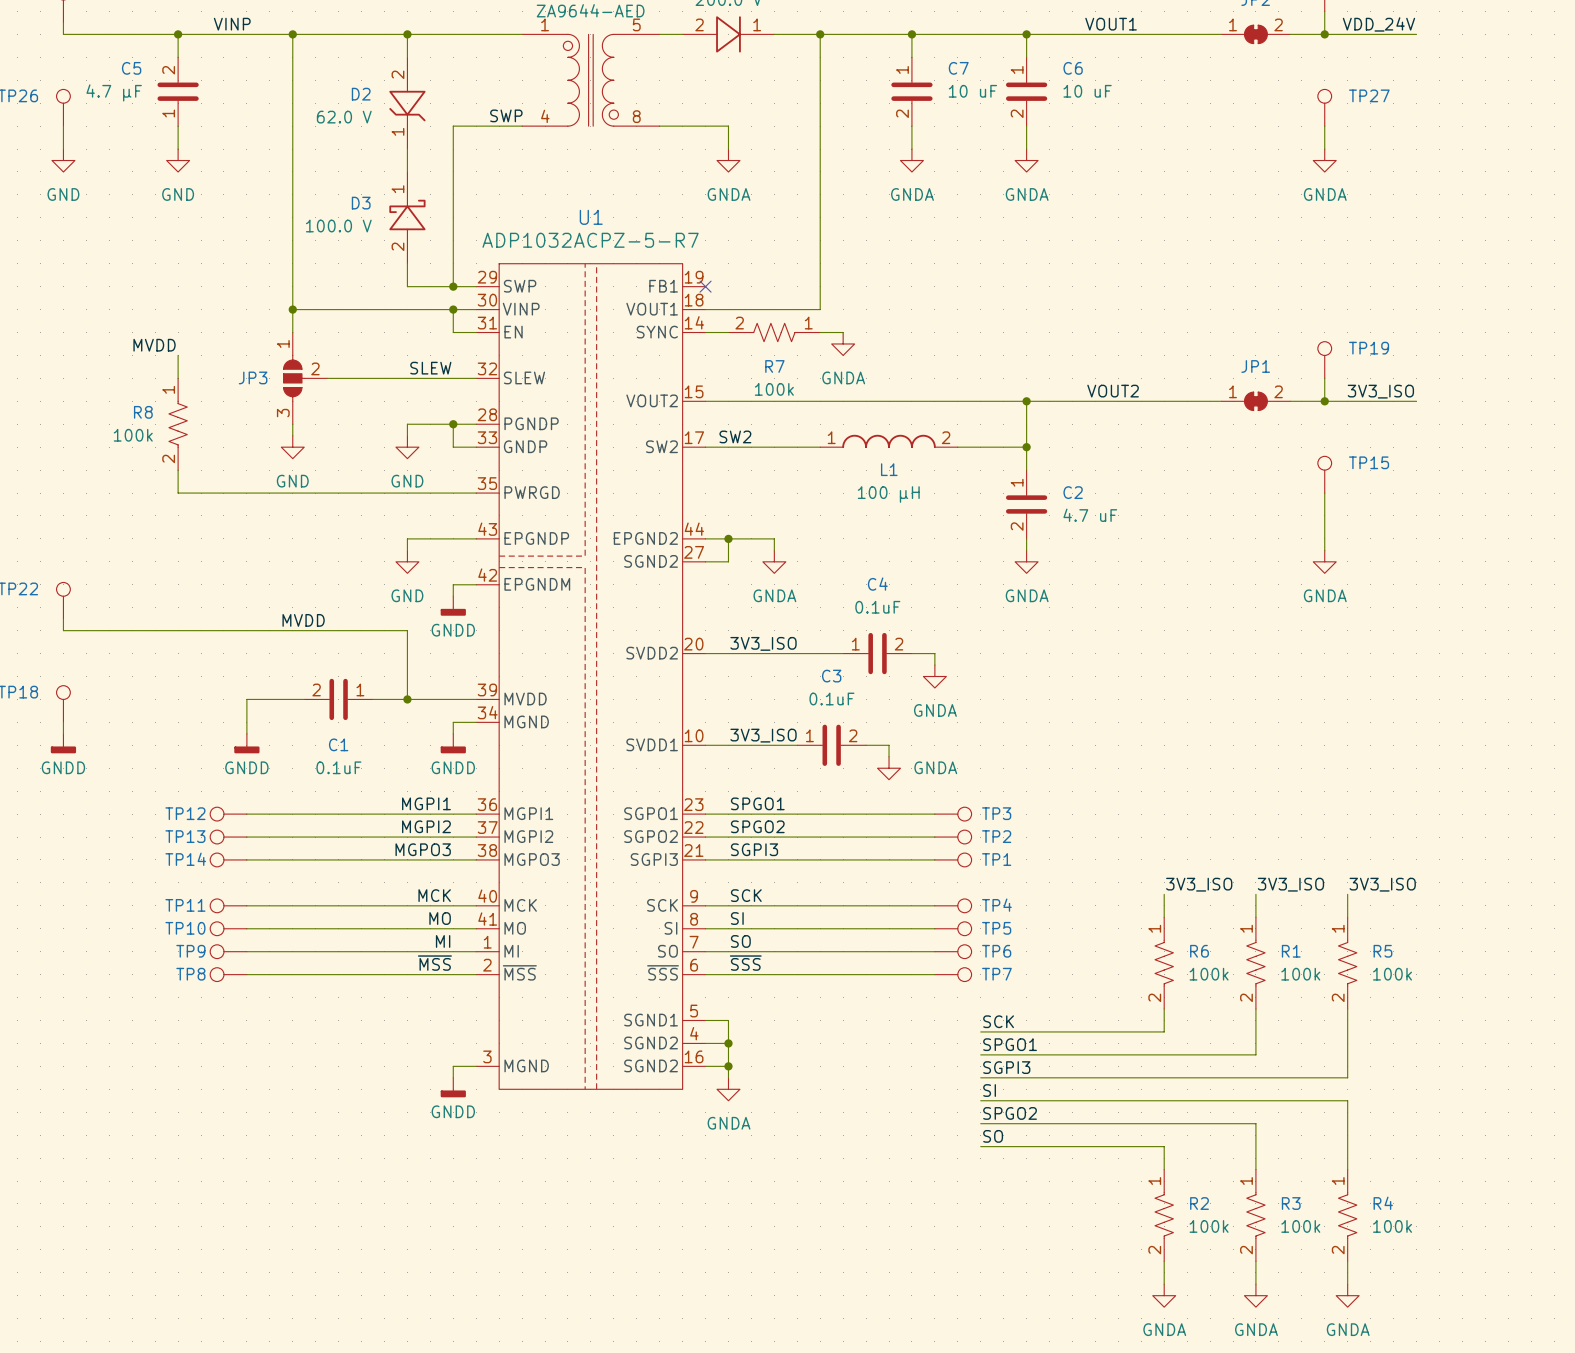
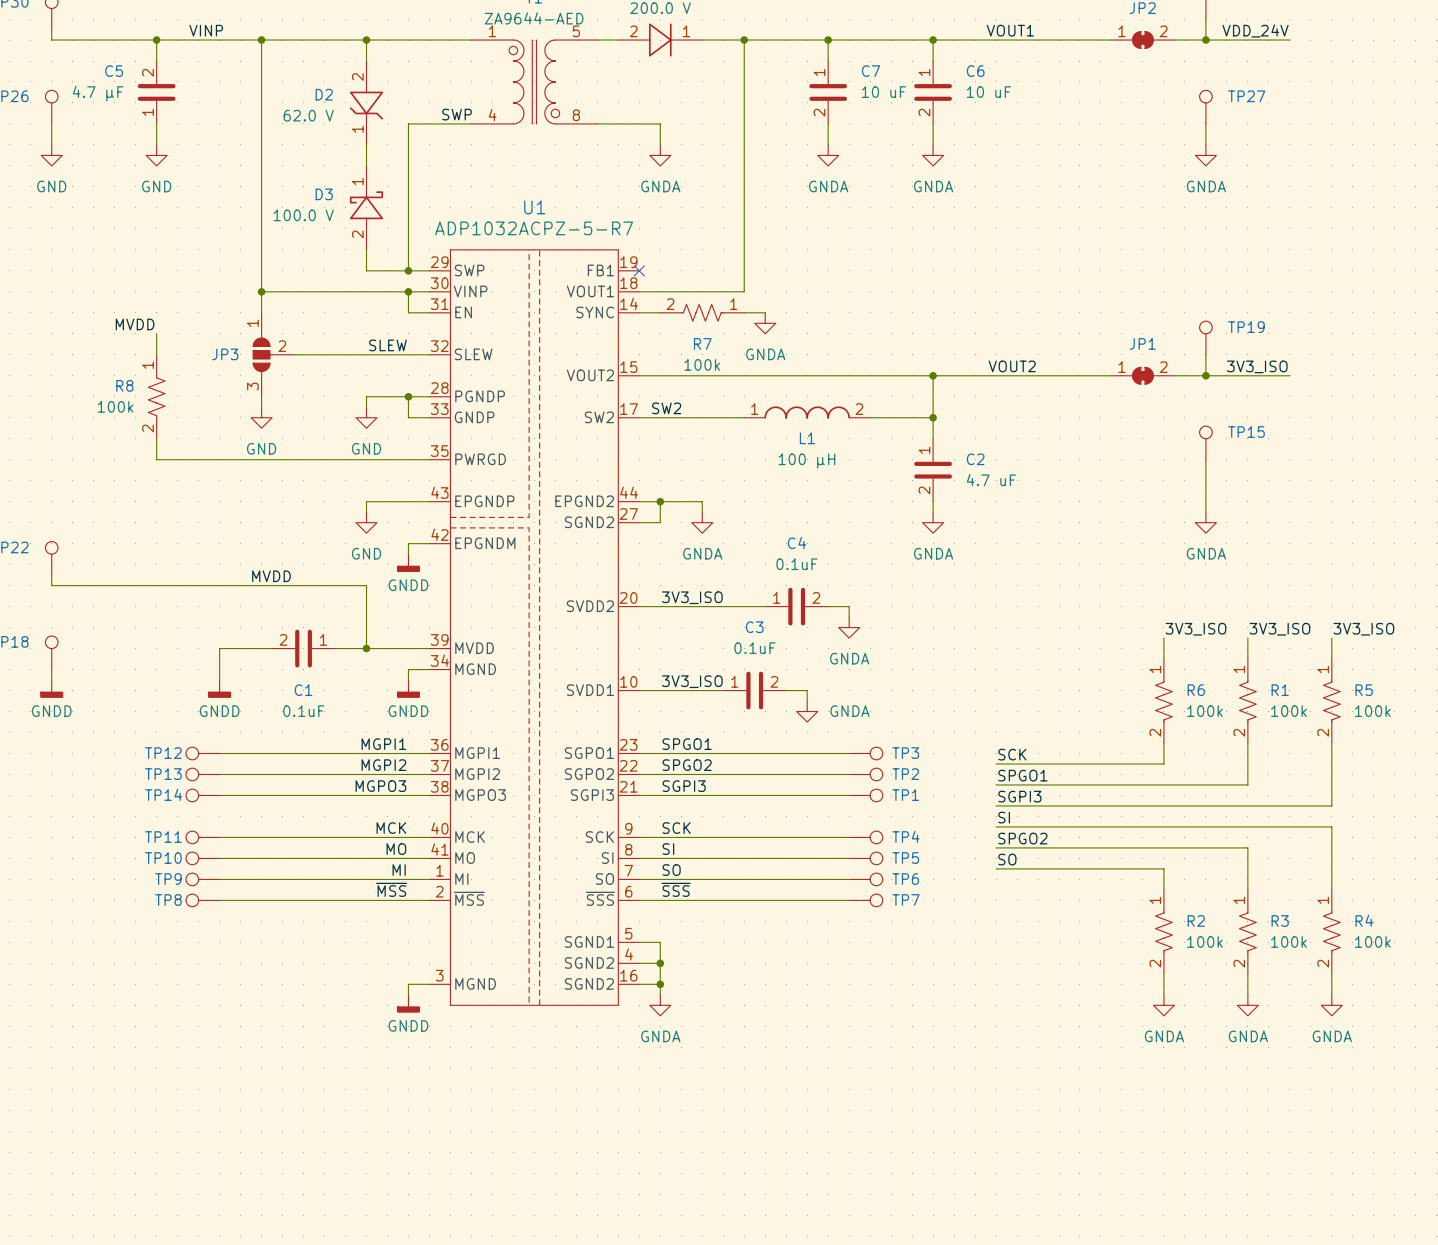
label: none -> 3V3_ISO (1195, 629)
label: none -> 3V3_ISO (1279, 629)
label: none -> 3V3_ISO (1363, 629)
wire: none -> (1331, 638) (1331, 659)
wire: none -> (1163, 743) (1163, 763) (996, 763)
wire: none -> (1247, 743) (1247, 784) (996, 784)
wire: none -> (1331, 743) (1331, 805) (996, 805)
label: none -> SCK (1012, 754)
label: none -> SPGO1 (1022, 775)
label: none -> SGPI3 (1019, 796)
label: none -> SI (1004, 817)
label: 3V3_ISO (1199, 884) -> none
label: 3V3_ISO (1290, 884) -> none
label: 3V3_ISO (1382, 884) -> none
wire: none -> (996, 826) (1331, 826) (1331, 889)
wire: (1164, 894) (1164, 917) -> none
wire: (1255, 894) (1255, 917) -> (1163, 638) (1163, 659)
wire: (1347, 894) (1347, 917) -> (1247, 638) (1247, 659)
label: none -> SPGO2 (1022, 838)
wire: none -> (996, 847) (1247, 847) (1247, 889)
label: none -> SO (1007, 859)
wire: none -> (996, 868) (1163, 868) (1163, 889)
R6 position: (1164, 963) -> (1163, 701)
R1 position: (1255, 963) -> (1247, 701)
R5 position: (1347, 963) -> (1331, 701)
wire: (1164, 1009) (1164, 1031) (980, 1031) -> none
wire: (1255, 1009) (1255, 1054) (980, 1054) -> none
wire: (1347, 1009) (1347, 1077) (980, 1077) -> none
label: SCK (998, 1021) -> none
label: SPGO1 (1010, 1044) -> none
wire: none -> (1331, 973) (1331, 994)
label: SGPI3 (1006, 1067) -> none
power symbol: none -> GNDA (1163, 1005)
power symbol: none -> GNDA (1247, 1005)
power symbol: none -> GNDA (1331, 1005)
label: SI (989, 1090) -> none
wire: (980, 1100) (1347, 1100) (1347, 1169) -> none
label: SPGO2 (1010, 1113) -> none
wire: (980, 1123) (1255, 1123) (1255, 1169) -> none
label: SO (993, 1136) -> none
wire: (980, 1146) (1164, 1146) (1164, 1169) -> none
R2 position: (1164, 1215) -> (1163, 931)
R3 position: (1255, 1215) -> (1247, 931)
R4 position: (1347, 1215) -> (1331, 931)
wire: (1164, 1261) (1164, 1284) -> none
wire: (1255, 1261) (1255, 1284) -> (1163, 973) (1163, 994)
wire: (1347, 1261) (1347, 1284) -> (1247, 973) (1247, 994)
power symbol: GNDA (1164, 1295) -> none
power symbol: GNDA (1255, 1295) -> none
power symbol: GNDA (1347, 1295) -> none

